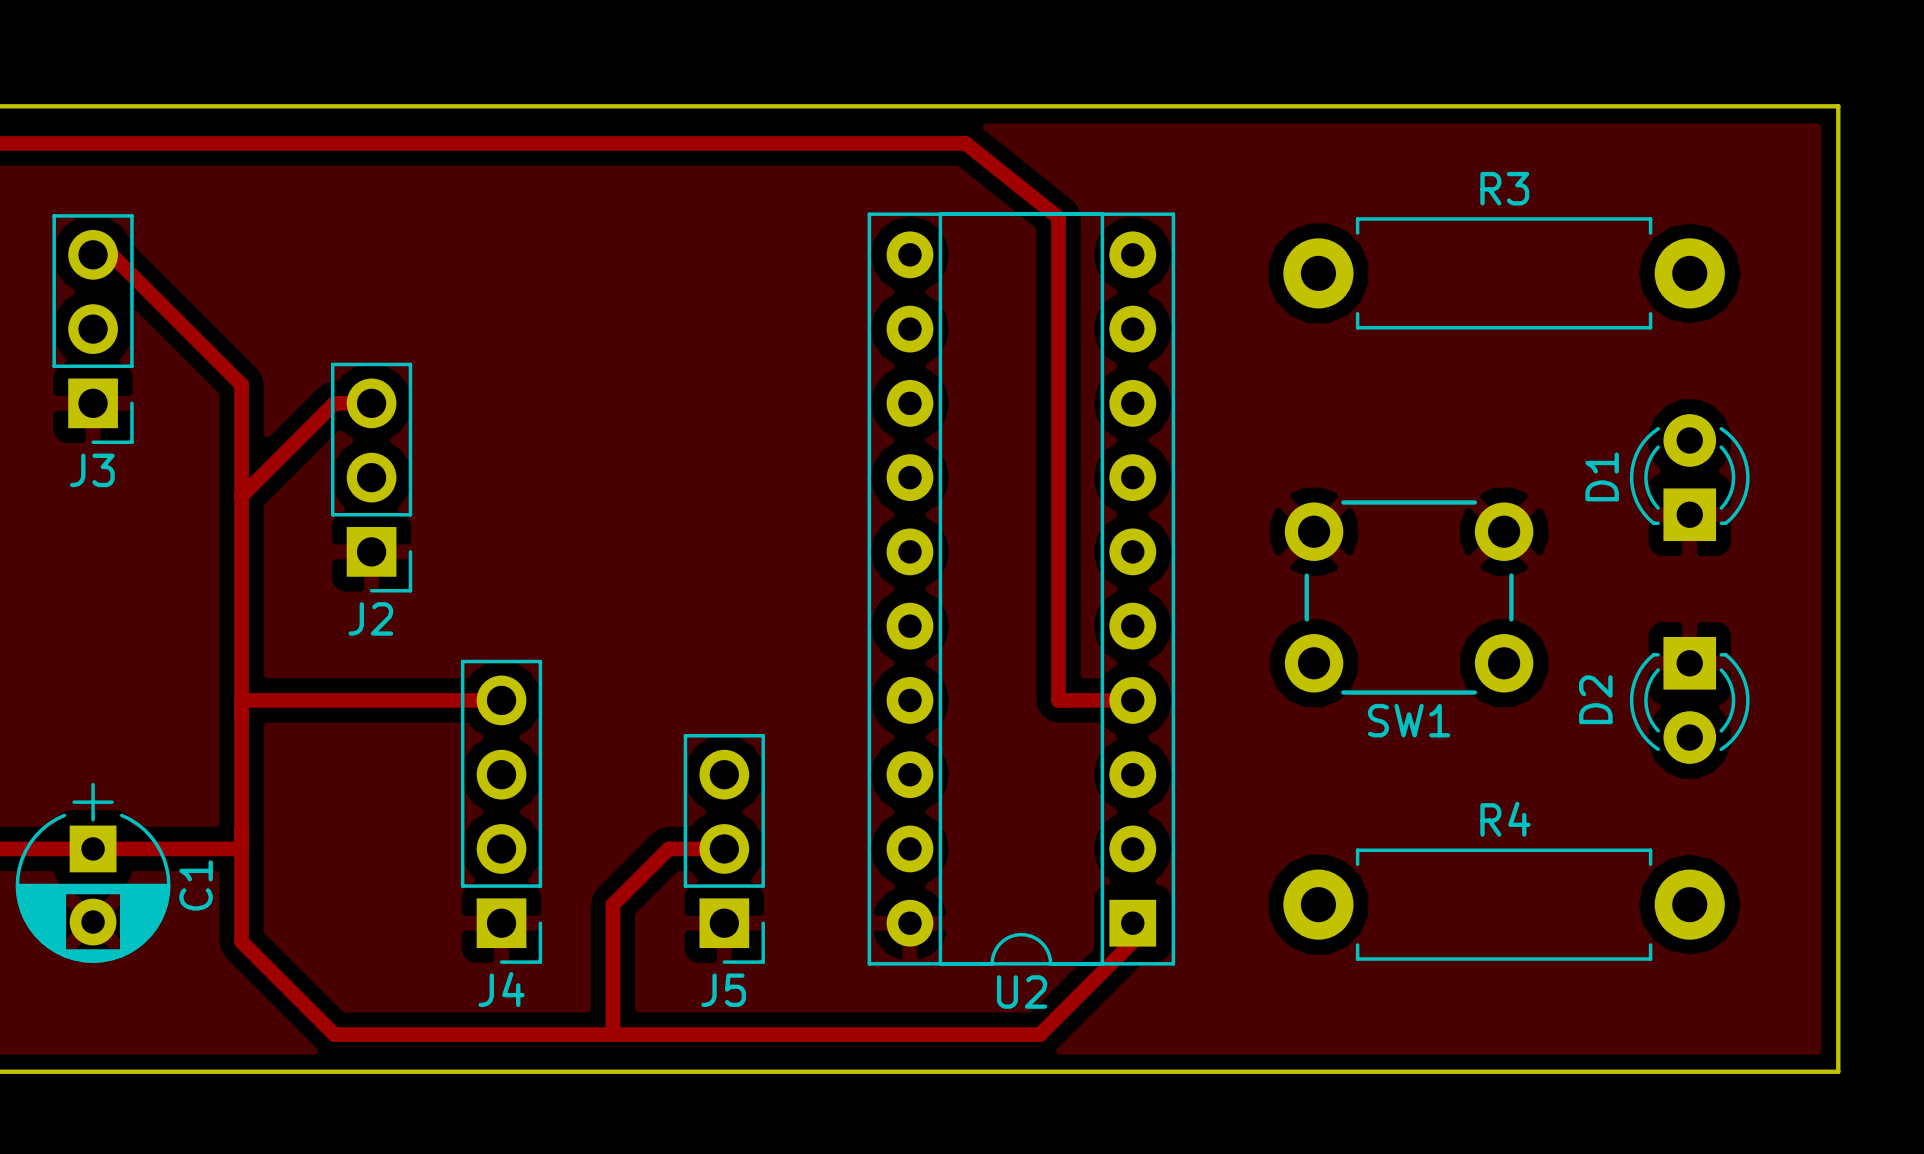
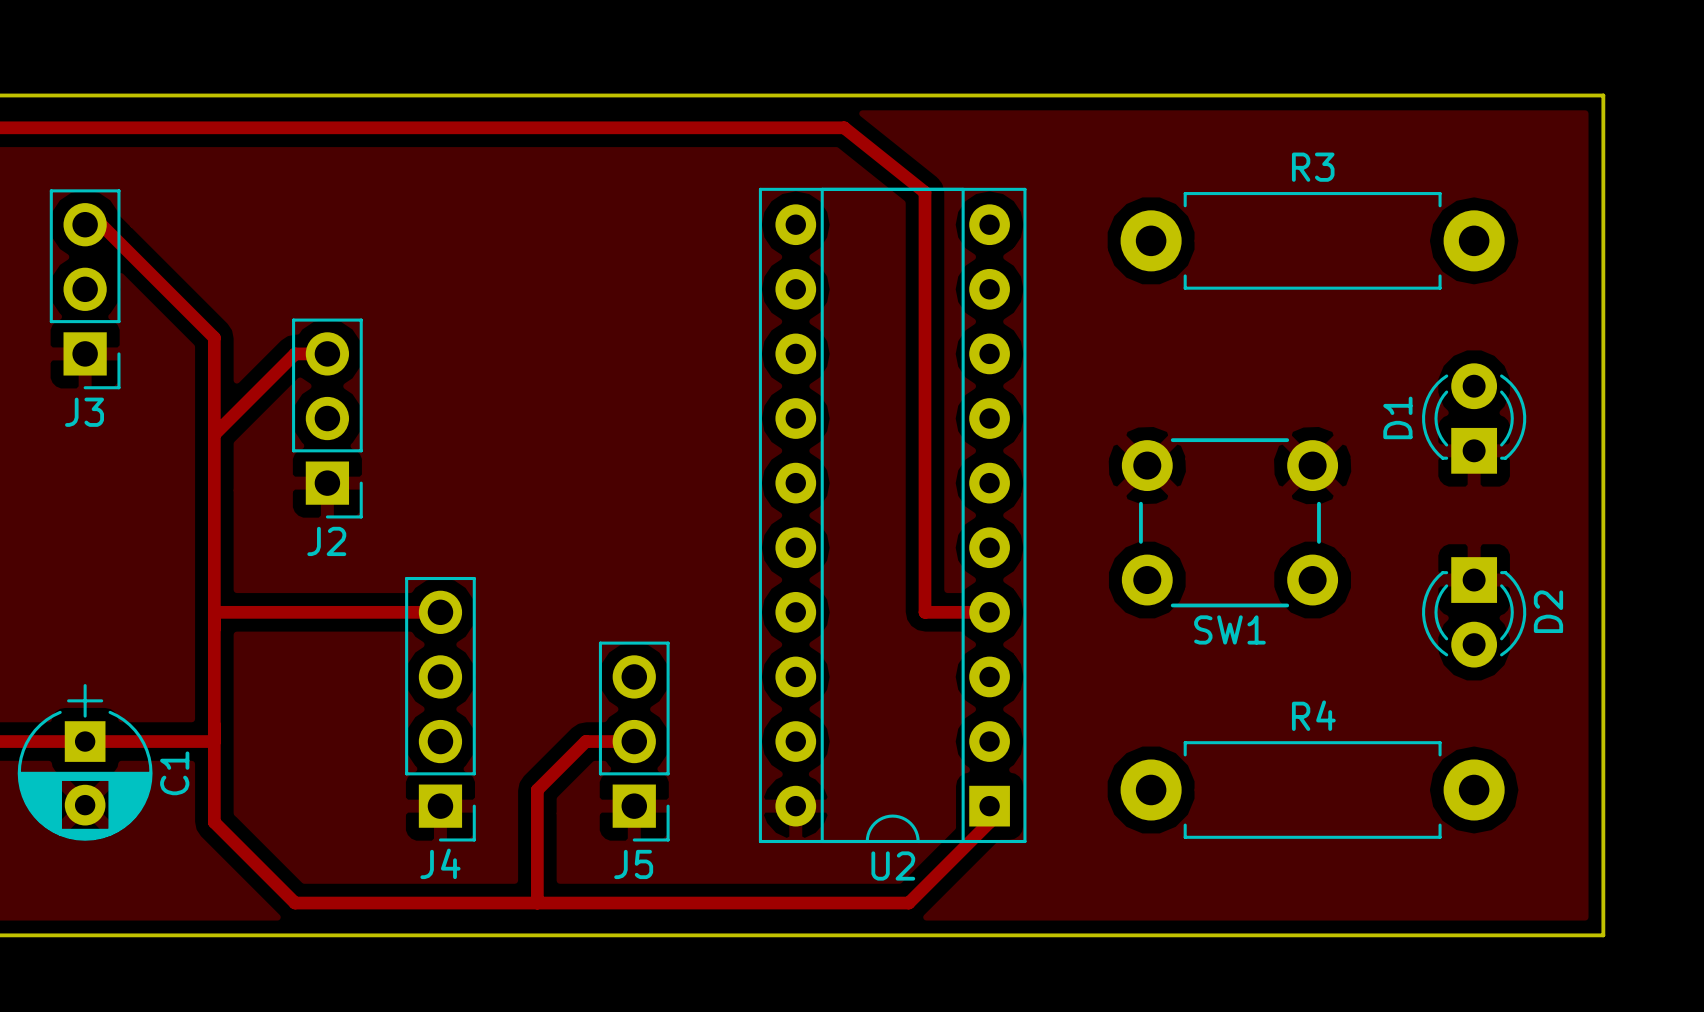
D2 name position: D2 (1595, 699) -> D2 (1548, 611)

